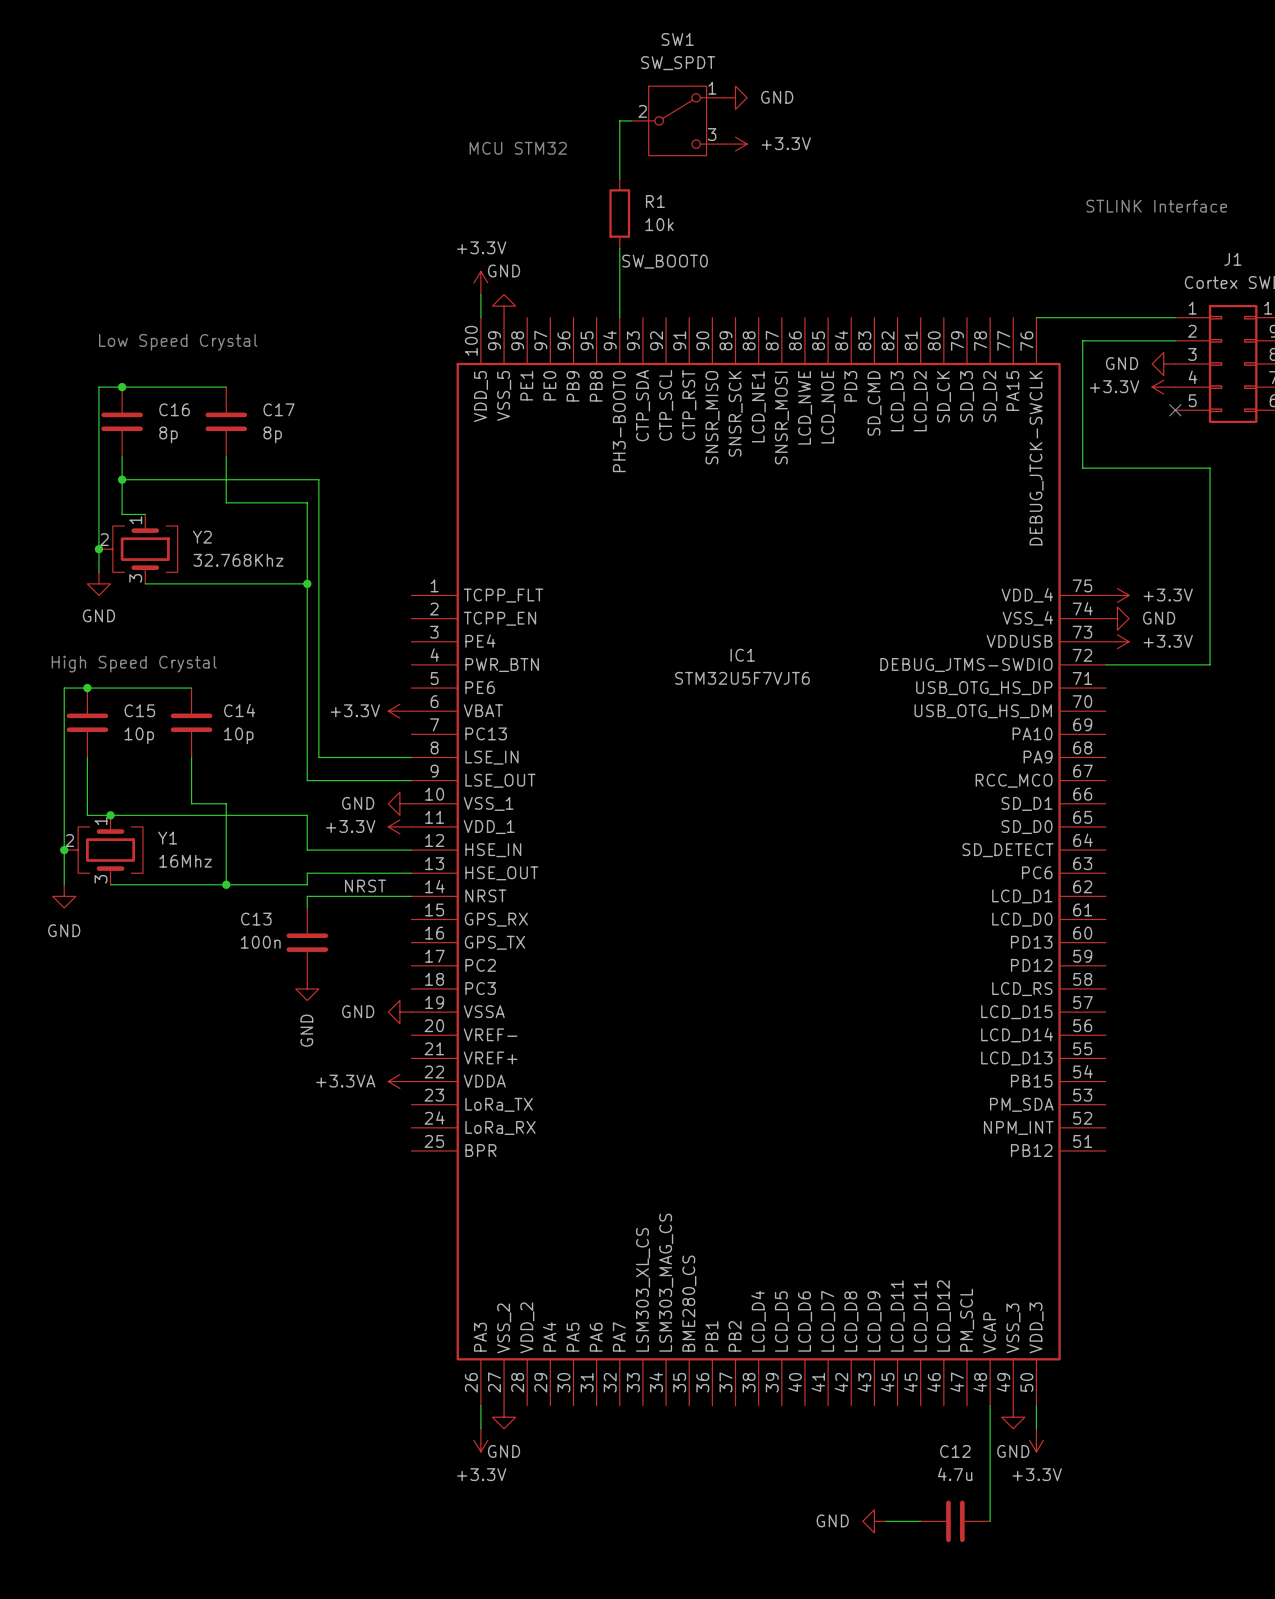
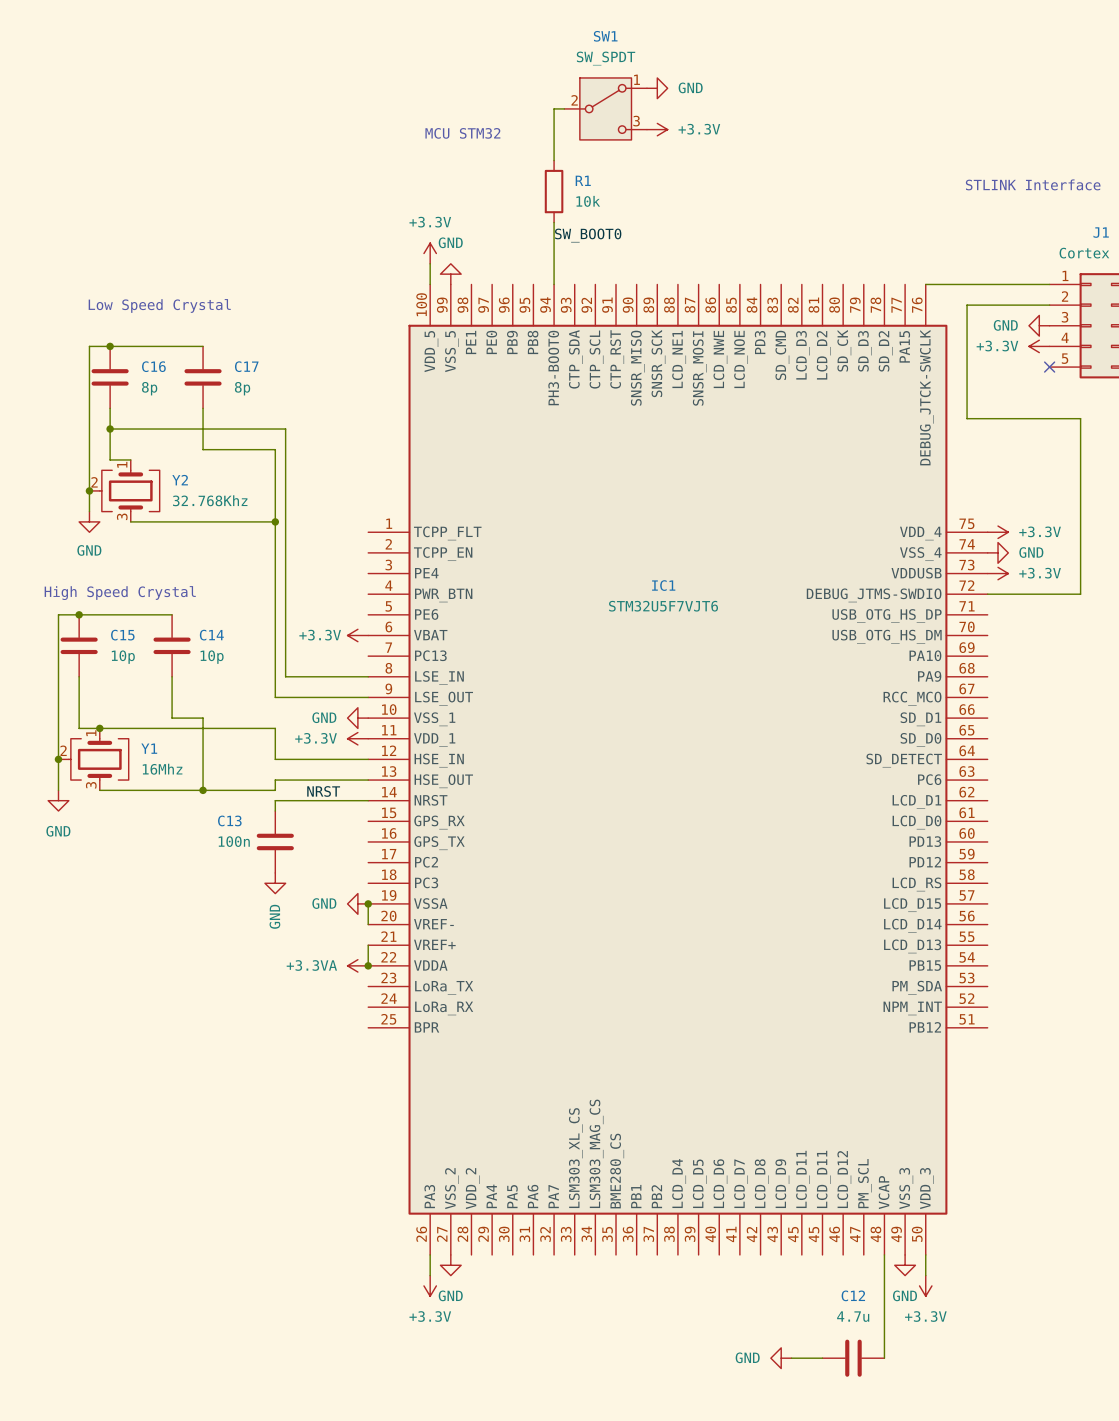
wire: none -> (368, 903) (368, 924)
junction: none -> (368, 903)
wire: none -> (368, 945) (368, 965)
junction: none -> (368, 965)

